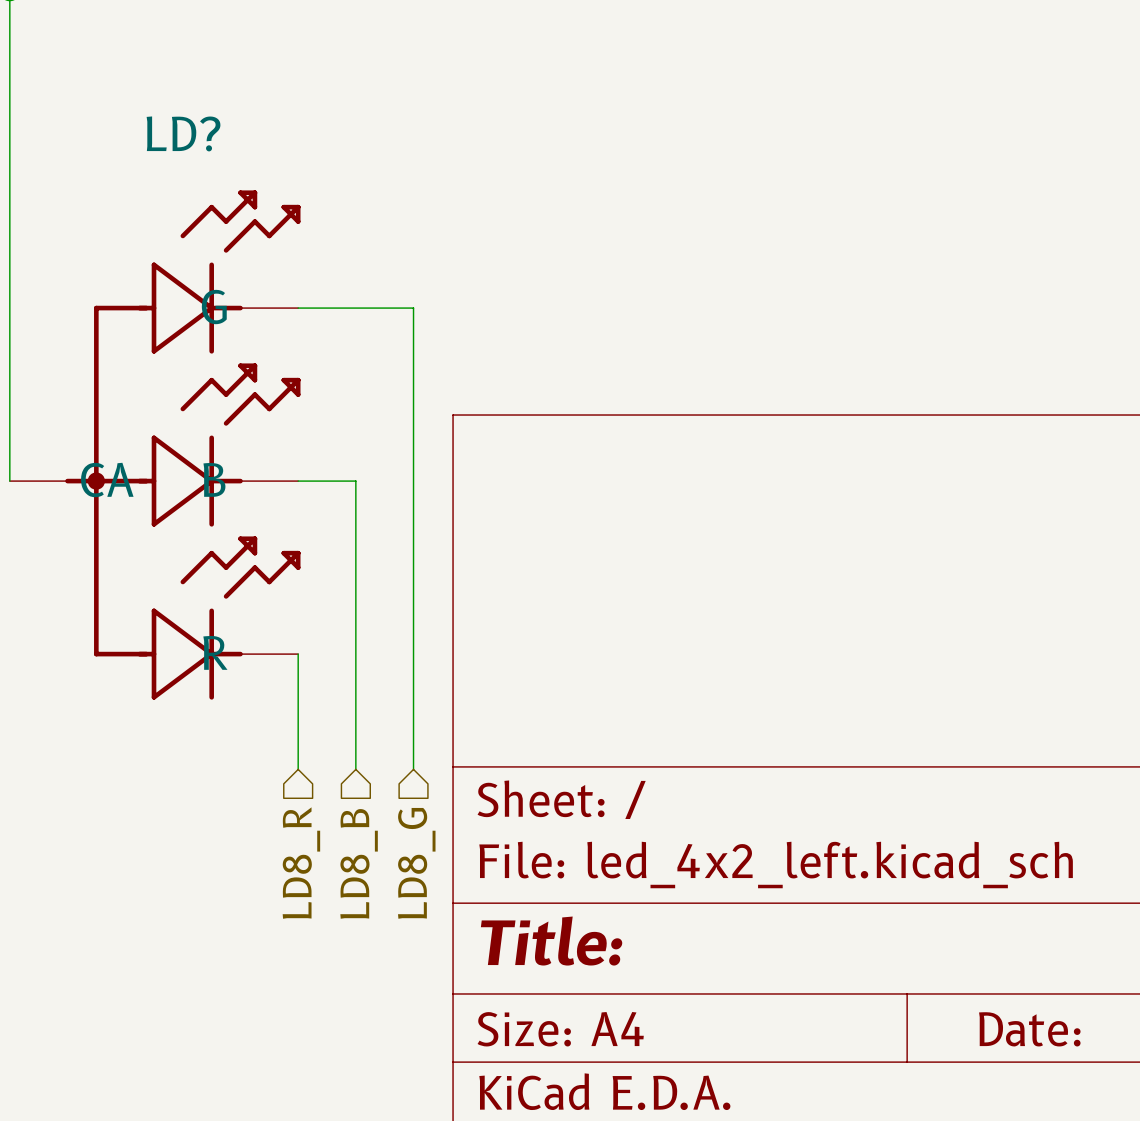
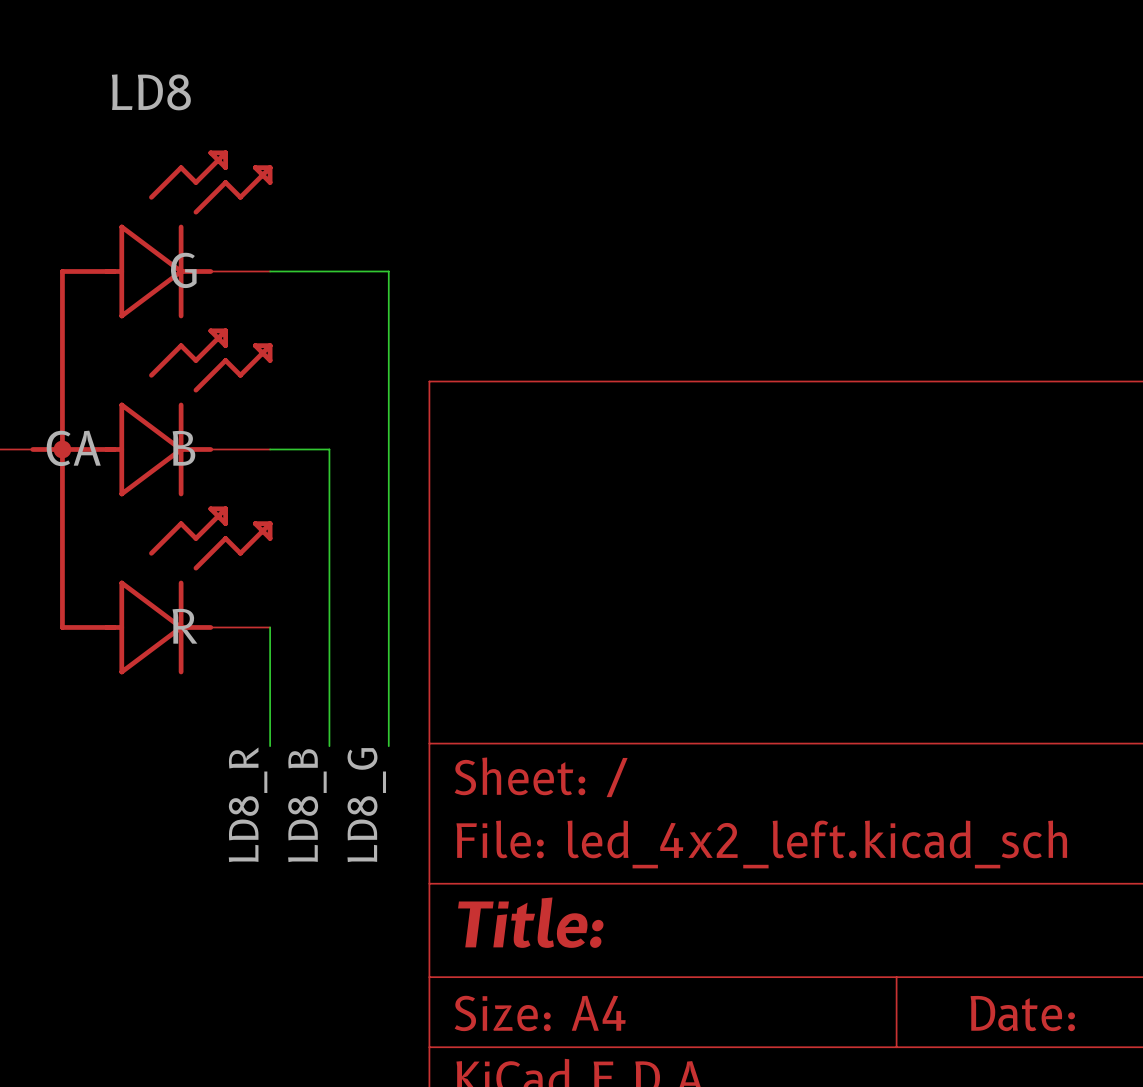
LD? name: LD? (183, 133) -> LD8 (151, 92)
label: none -> LD8_R (248, 804)
label: none -> LD8_G (366, 805)
label: none -> LD8_B (307, 805)
hierarchical label: LD8_R (301, 863) -> none
hierarchical label: LD8_B (359, 863) -> none
hierarchical label: LD8_G (416, 863) -> none

